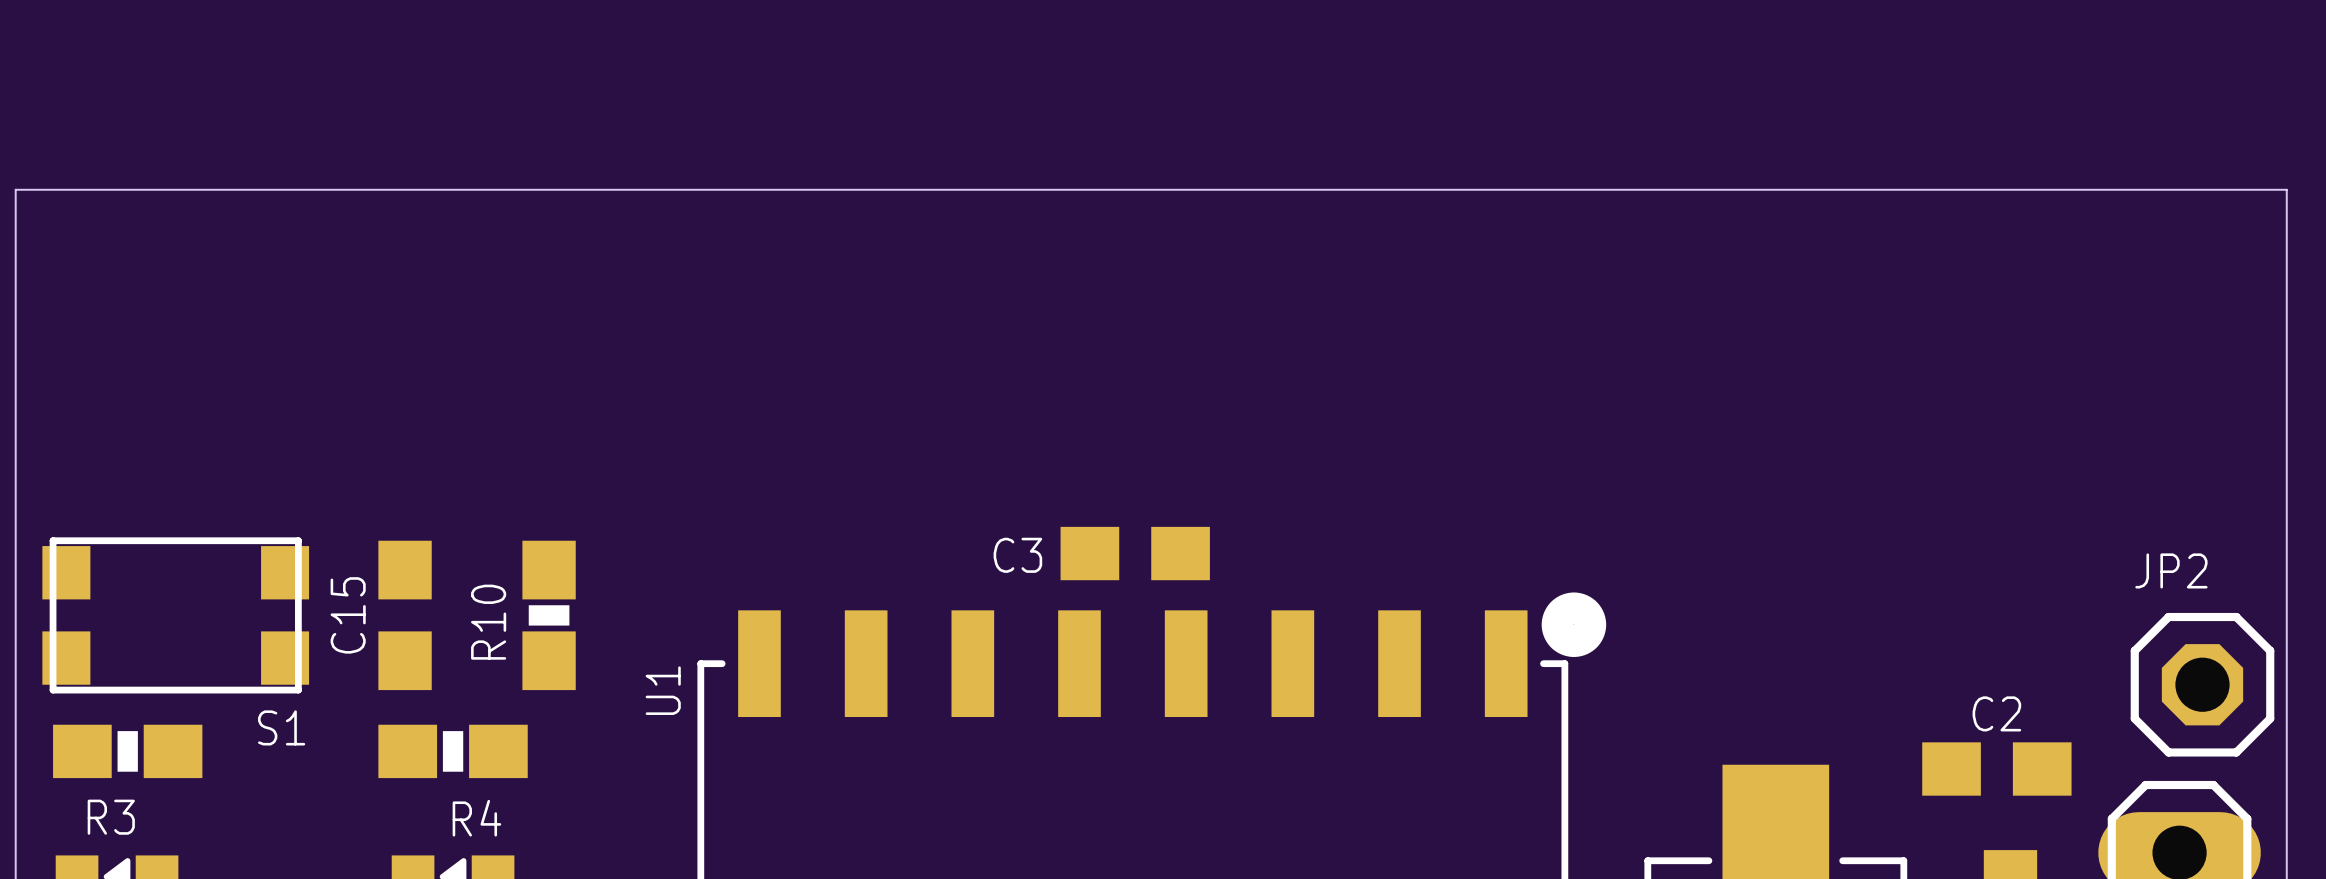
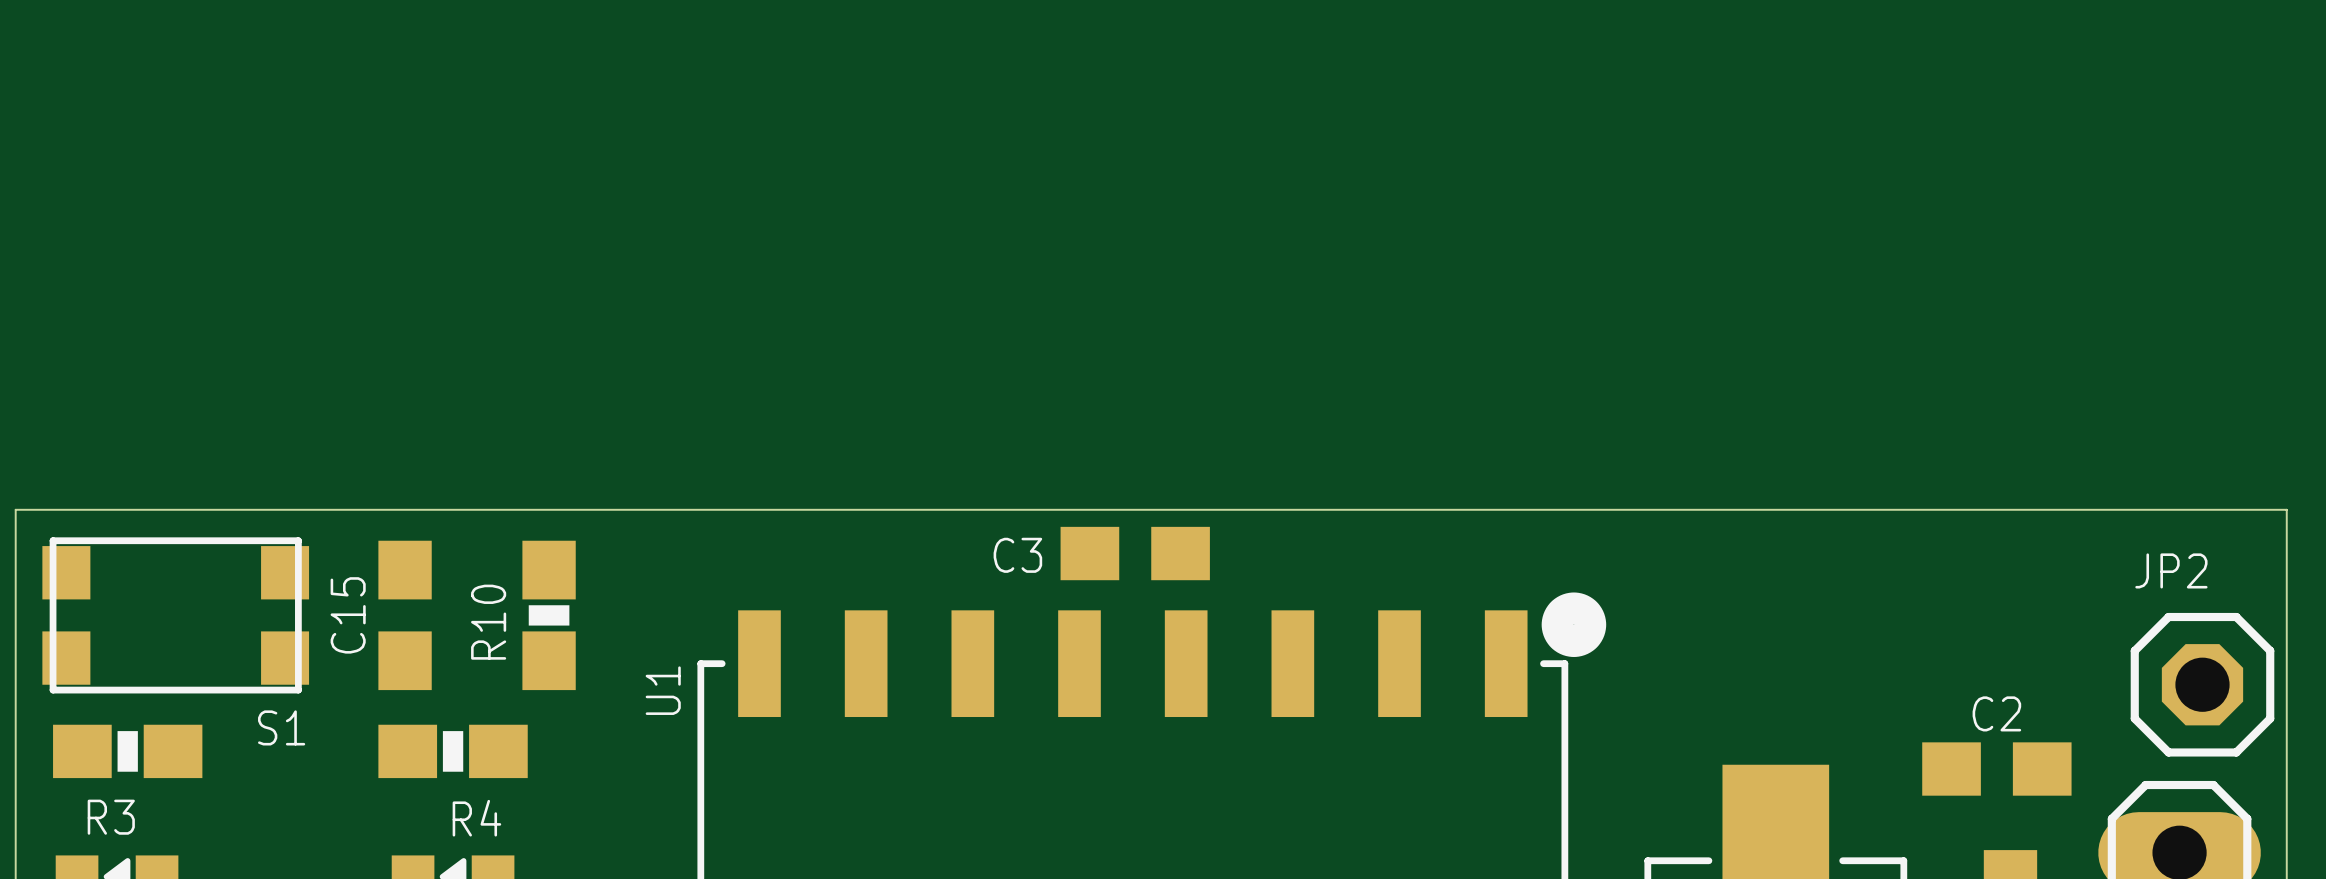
board edge: (15, 509) (15, 189) (2286, 189) (2286, 509) -> (15, 509) (2286, 509)

